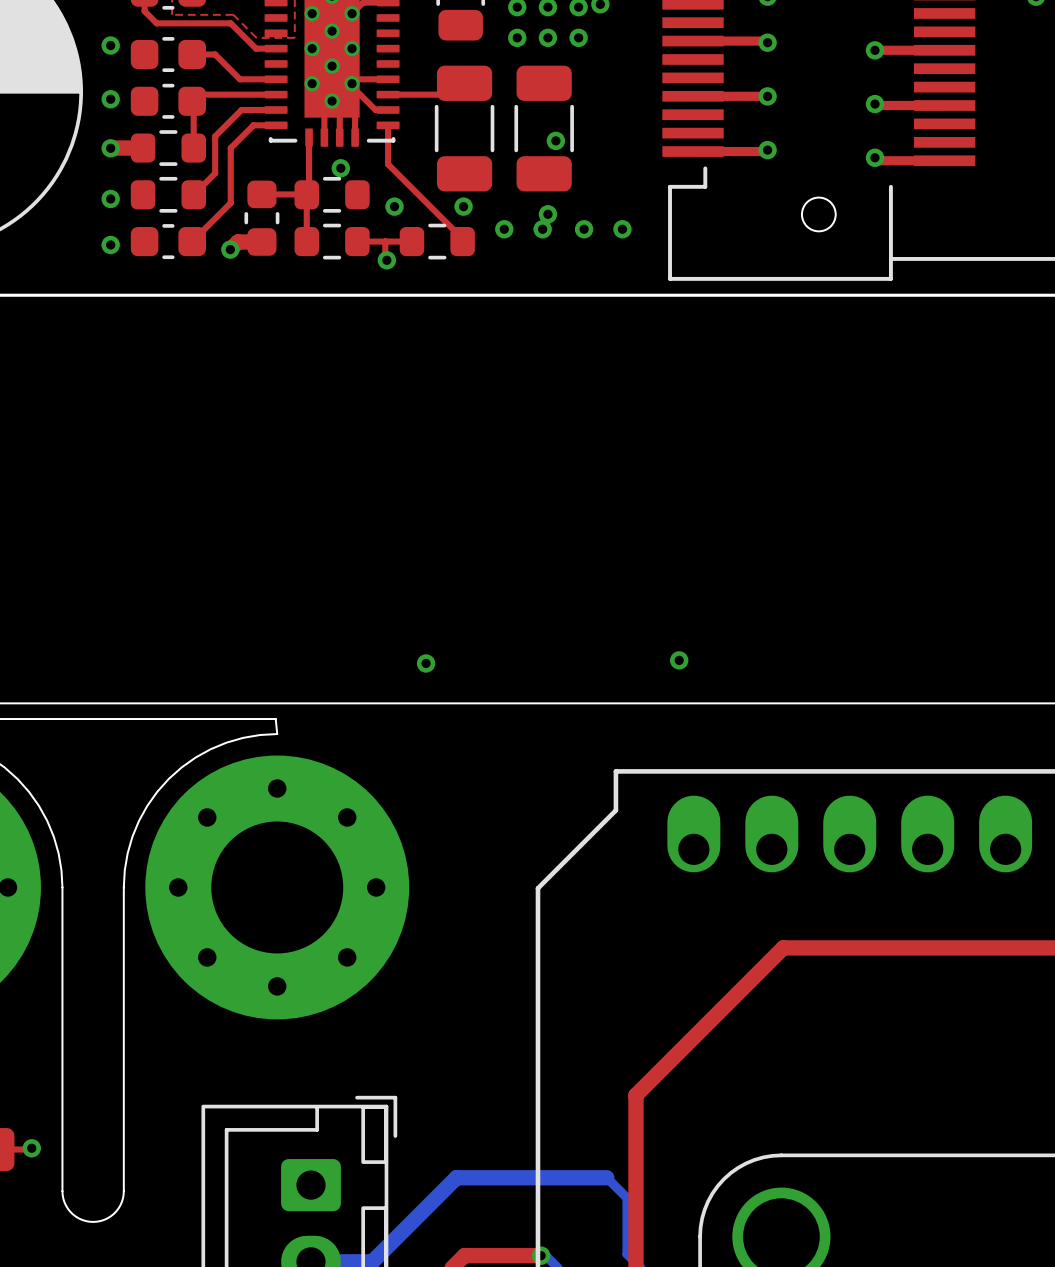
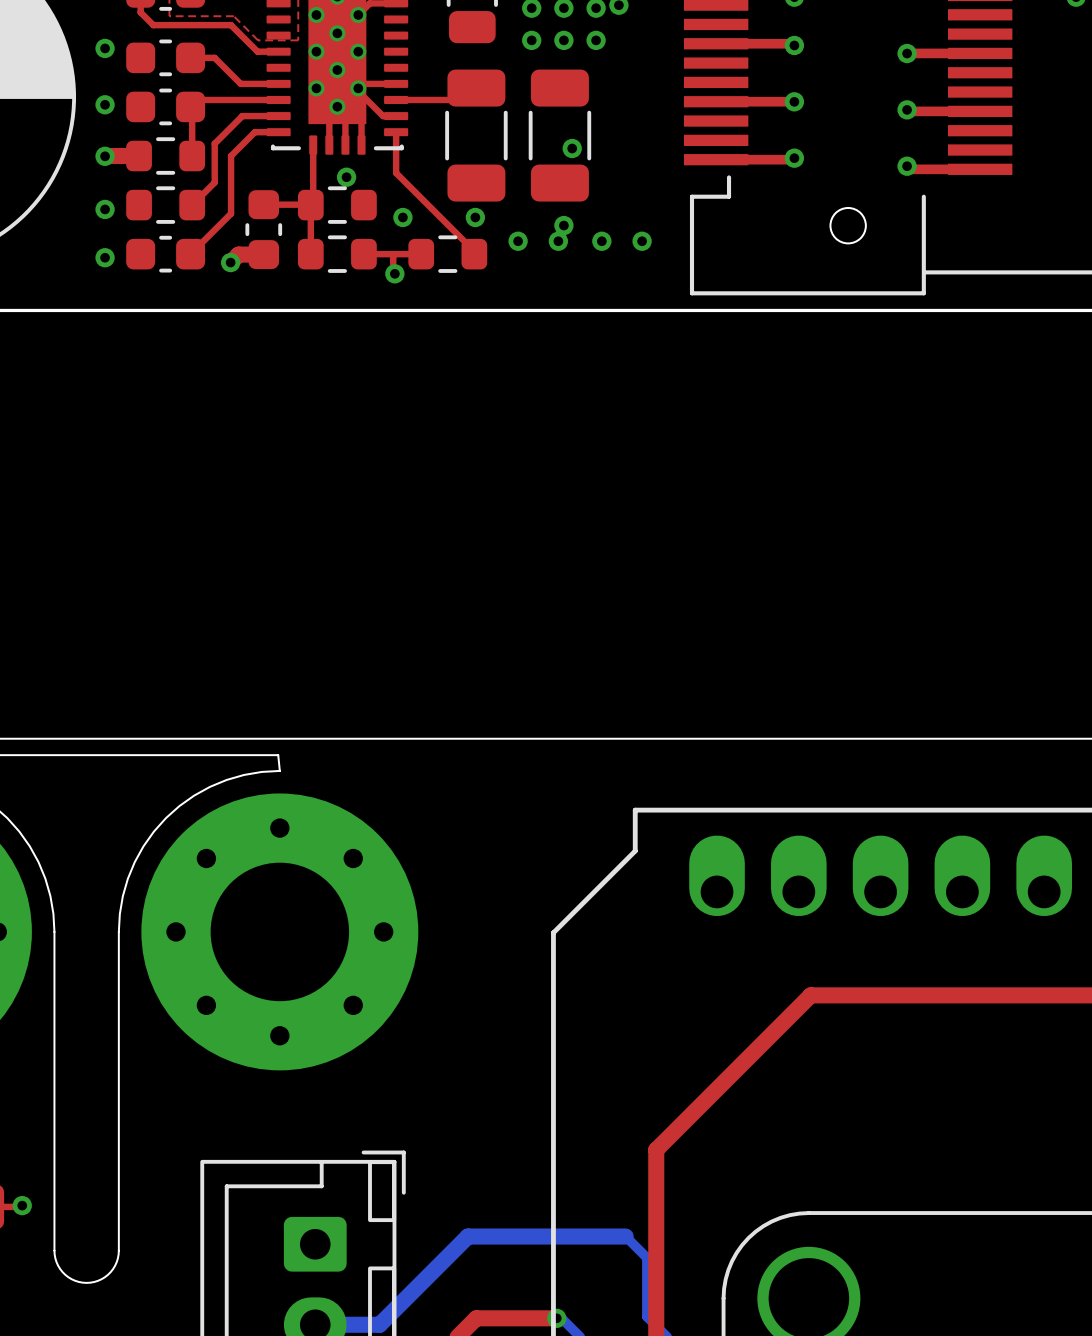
via: (679, 660) -> none
via: (426, 663) -> none

